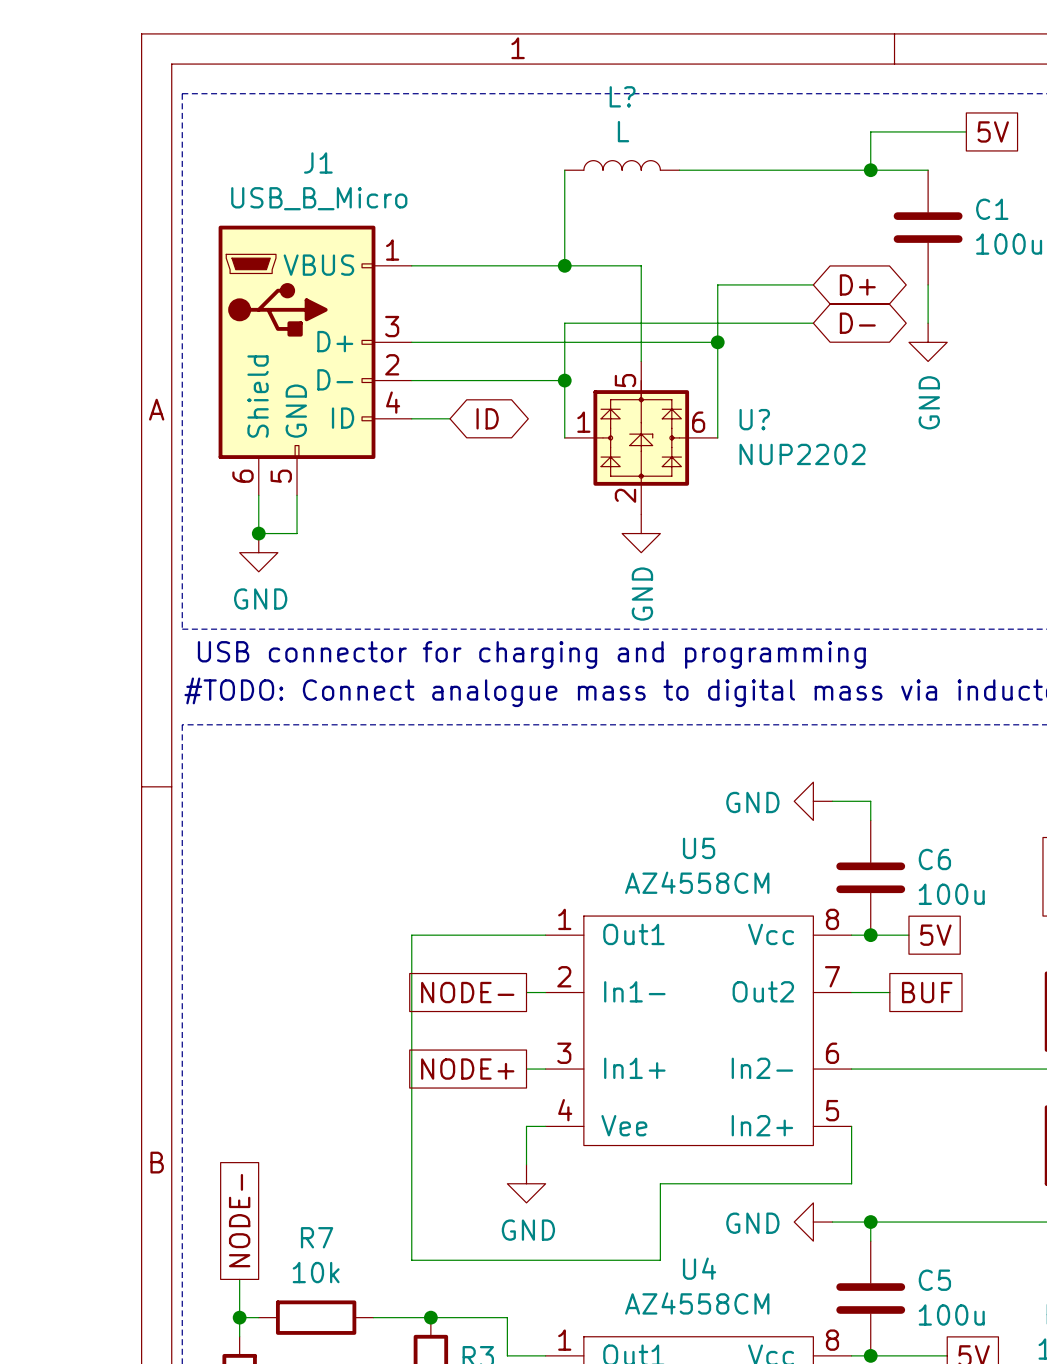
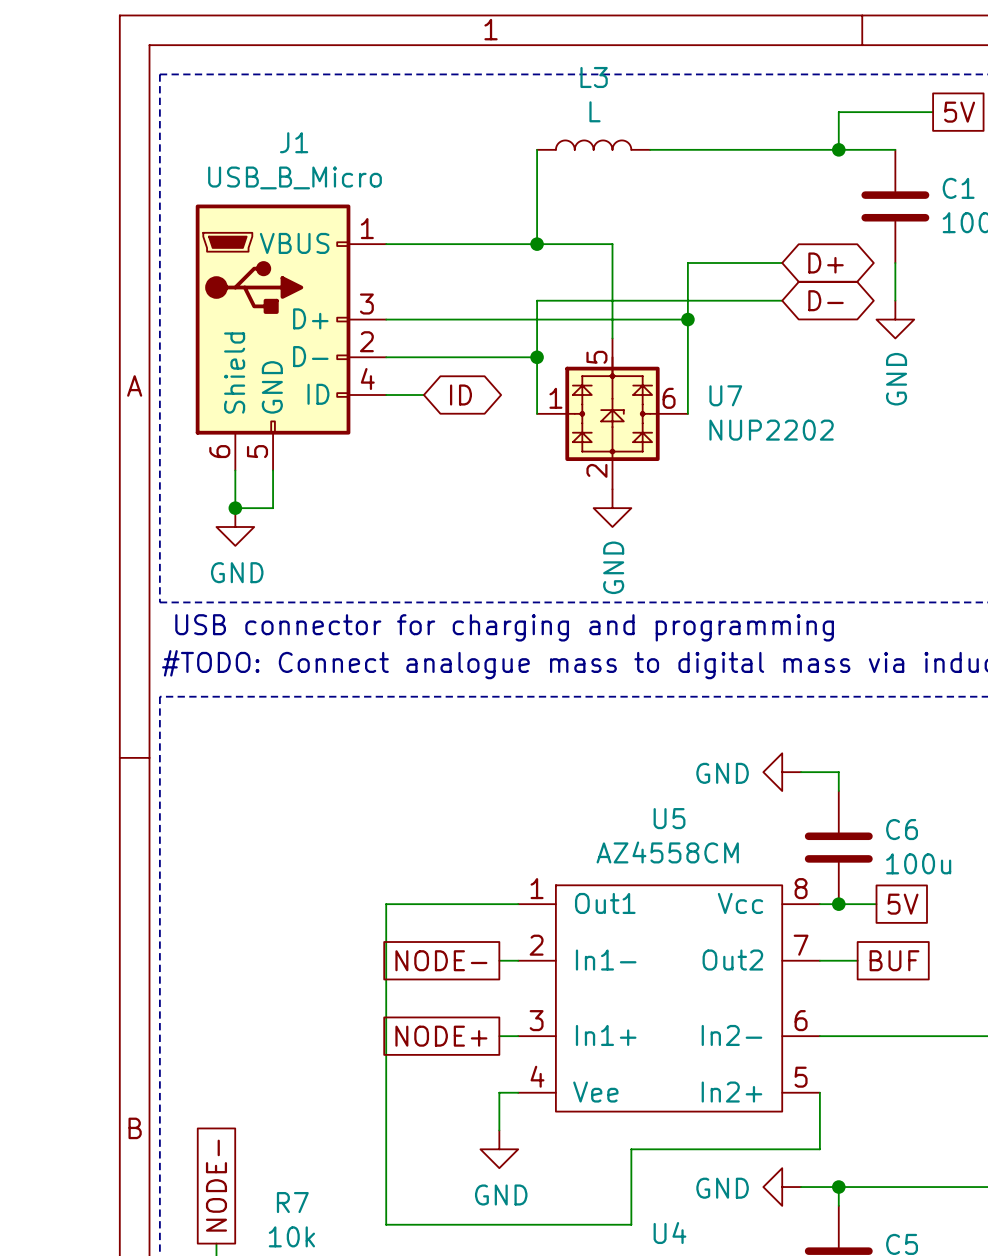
L? name: L? (622, 96) -> L3 (594, 77)
U? name: U? (754, 419) -> U7 (725, 395)

